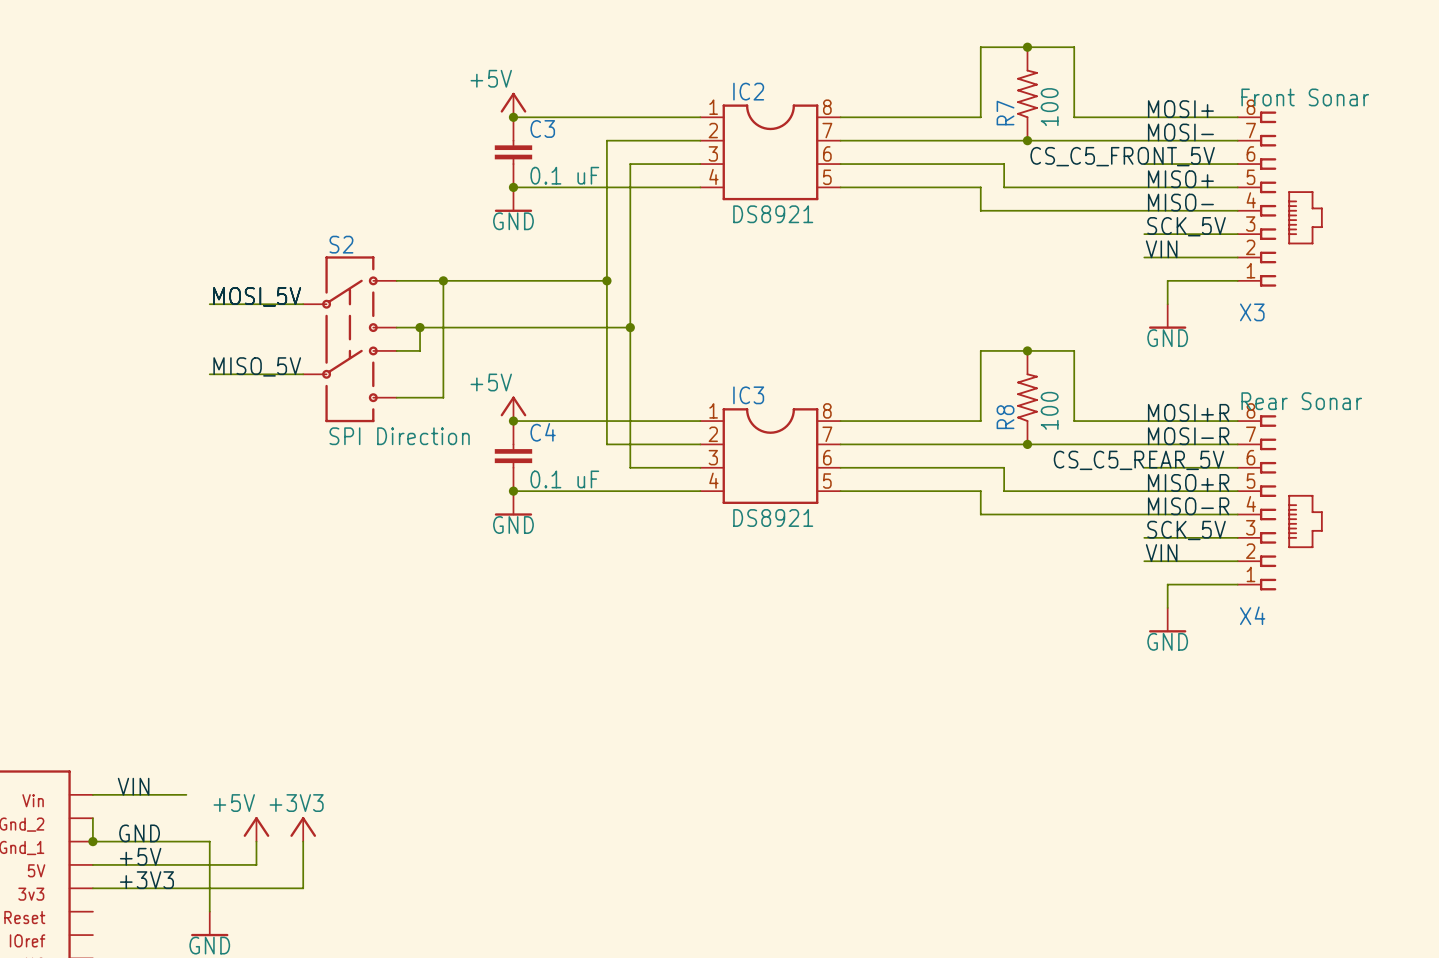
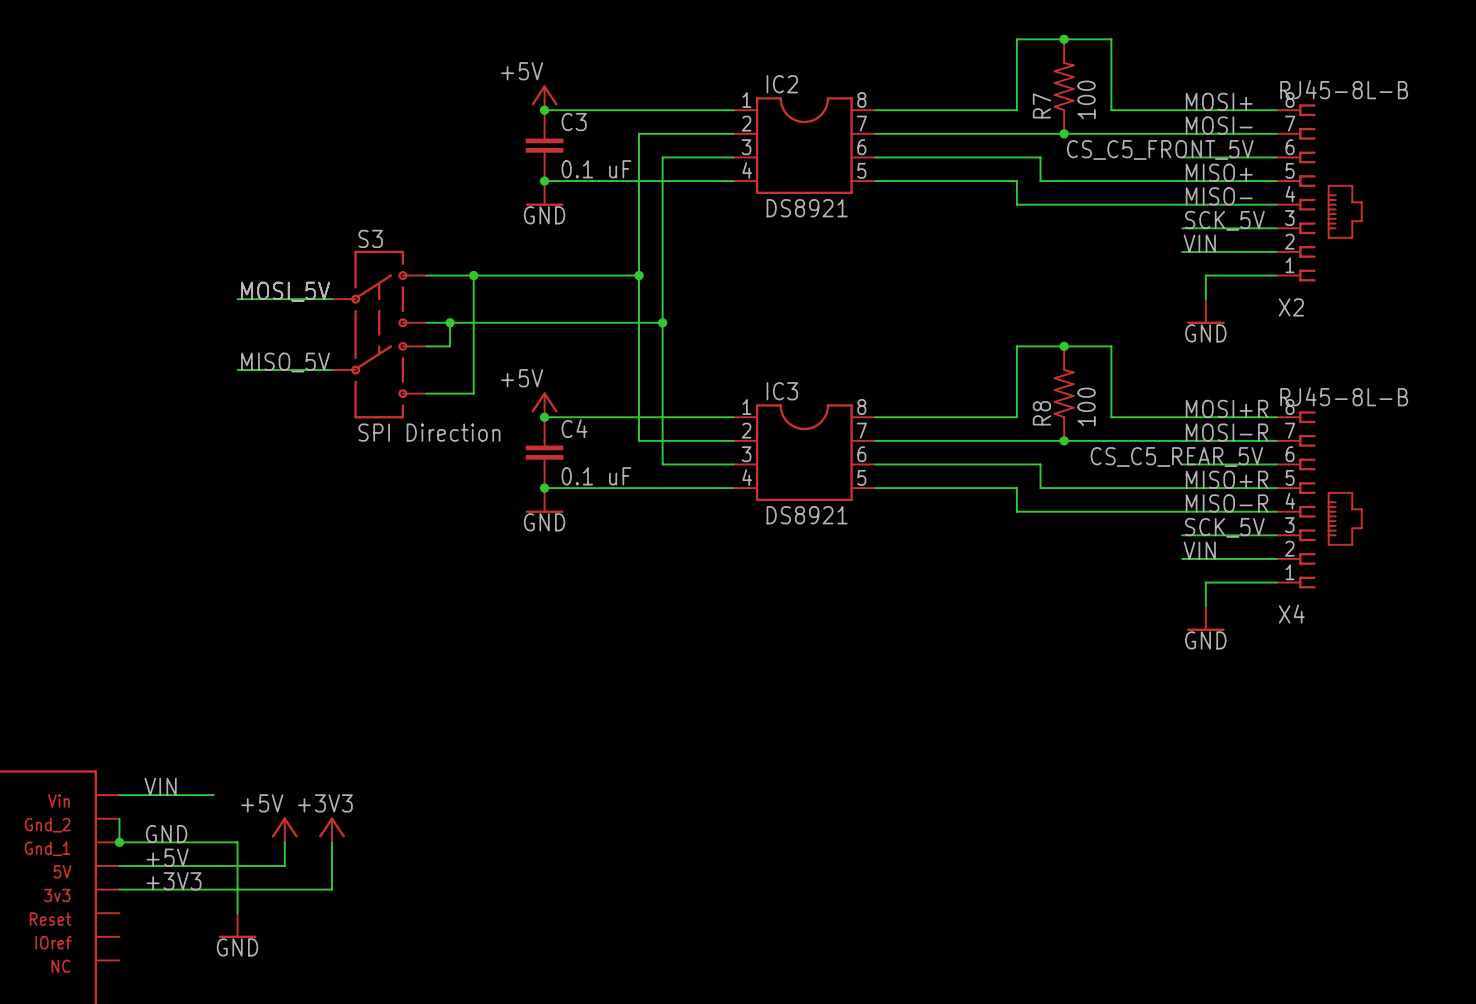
X3 value: Front Sonar (1305, 97) -> RJ45-8L-B (1344, 89)
S2 name: S2 (341, 244) -> S3 (370, 238)
X3 name: X3 (1252, 312) -> X2 (1291, 307)
X4 value: Rear Sonar (1301, 401) -> RJ45-8L-B (1344, 396)

